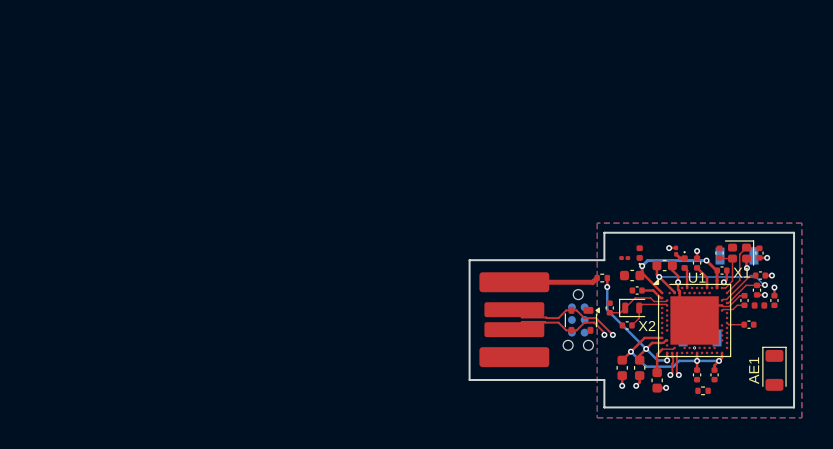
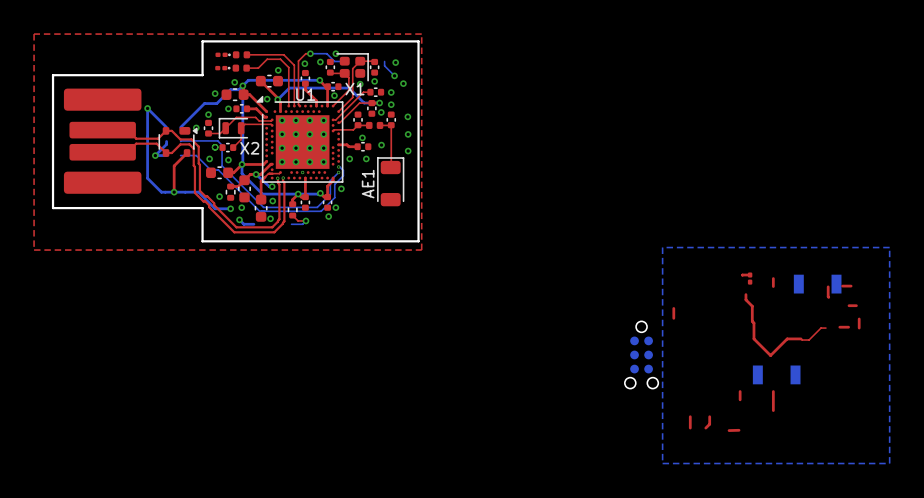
top zone outline: none -> (34, 34) (421, 34) (421, 250) (34, 250) (34, 34)
board edge: none -> (202, 41) (202, 75) (53, 75) (53, 208) (202, 208) (202, 241) (418, 241) (418, 41) (202, 41)
top track: none -> (310, 53) (305, 53) (298, 61) (299, 106)
bottom track: none -> (310, 53) (326, 53) (334, 61) (346, 61)
via: none -> (310, 53)
via: none -> (335, 53)
part: none -> (221, 54)
part: none -> (239, 54)
top track: none -> (246, 54) (283, 54) (294, 65) (294, 106)
via: none -> (320, 62)
top track: none -> (374, 61) (360, 61) (352, 68) (352, 97) (338, 111)
bottom track: none -> (384, 61) (384, 65) (394, 75)
via: none -> (395, 62)
via: none -> (304, 63)
part: none -> (330, 67)
part: none -> (374, 67)
part: none -> (221, 68)
part: none -> (238, 68)
top track: none -> (246, 68) (258, 68) (267, 59) (280, 59) (288, 67) (288, 106)
via: none -> (278, 70)
top track: none -> (330, 72) (344, 73) (348, 77) (348, 90) (333, 106)
via: none -> (394, 75)
part: none -> (305, 78)
top track: none -> (319, 80) (327, 86) (327, 106)
bottom track: none -> (319, 80) (248, 80) (238, 89) (230, 89) (216, 103) (204, 103) (180, 127)
via: none -> (319, 80)
top track: none -> (260, 81) (277, 98) (280, 102) (280, 111)
part: none -> (269, 81)
via: none -> (374, 81)
via: none -> (234, 82)
top track: none -> (305, 83) (305, 89) (316, 100) (316, 106)
via: none -> (360, 84)
via: none -> (403, 83)
top track: none -> (242, 85) (243, 94) (249, 94) (266, 111)
bottom track: none -> (242, 85) (242, 173) (262, 194) (320, 193)
via: none -> (242, 85)
part: none -> (333, 86)
top track: none -> (370, 92) (363, 92) (335, 119) (333, 119)
part: none -> (375, 92)
via: none -> (391, 92)
via: none -> (215, 93)
part: none -> (235, 94)
via: none -> (334, 95)
via: none -> (267, 99)
bottom track: none -> (277, 99) (289, 88) (349, 88) (364, 103) (379, 103)
via: none -> (277, 99)
top track: none -> (379, 103) (359, 103) (338, 122)
via: none -> (379, 103)
via: none -> (391, 104)
via: none -> (147, 108)
part: none -> (371, 108)
via: none -> (228, 108)
part: none -> (241, 108)
top track: none -> (247, 108) (256, 108) (266, 117)
via: none -> (381, 112)
via: none -> (208, 114)
via: none -> (407, 116)
top track: none -> (272, 119) (259, 120) (255, 117) (236, 117) (220, 133) (208, 133)
via: none -> (282, 120)
via: none -> (296, 120)
via: none -> (309, 120)
via: none -> (323, 120)
part: none -> (358, 119)
part: none -> (391, 119)
top track: none -> (272, 125) (245, 124) (241, 128) (241, 139) (233, 147)
top track: none -> (369, 125) (358, 125) (353, 129) (333, 130)
part: none -> (374, 125)
top track: none -> (380, 125) (391, 125) (391, 163) (392, 163)
bottom track: none -> (166, 127) (147, 108) (147, 178) (161, 192) (198, 192) (215, 208) (230, 208)
via: none -> (196, 127)
part: none -> (208, 128)
top track: none -> (102, 130) (127, 130) (136, 138) (158, 138) (166, 130) (171, 130) (180, 139) (191, 139) (198, 146) (199, 190) (236, 227) (272, 227) (278, 221) (279, 184) (277, 178)
via: none -> (282, 134)
via: none -> (296, 134)
via: none -> (309, 134)
via: none -> (323, 134)
via: none -> (408, 134)
via: none -> (362, 137)
part: none -> (102, 141)
bottom track: none -> (166, 141) (166, 144) (155, 155) (166, 155)
part: none -> (178, 141)
bottom track: none -> (180, 141) (217, 140) (222, 145) (222, 165) (263, 207) (317, 207) (330, 194) (330, 180) (338, 172)
top track: none -> (338, 144) (357, 146)
via: none -> (381, 145)
via: none -> (215, 147)
part: none -> (362, 146)
part: none -> (227, 147)
via: none -> (282, 148)
via: none -> (296, 148)
via: none -> (309, 148)
via: none -> (323, 148)
via: none -> (408, 151)
top track: none -> (102, 152) (127, 152) (136, 143) (156, 143) (166, 153) (171, 153) (180, 144) (189, 144) (193, 148) (194, 192) (234, 232) (274, 232) (282, 223) (283, 178)
top track: none -> (187, 153) (174, 165) (174, 192)
via: none -> (155, 155)
bottom track: none -> (180, 155) (196, 155) (210, 170) (218, 170) (259, 211) (321, 211) (334, 197) (334, 184) (343, 175) (343, 170) (338, 166)
via: none -> (209, 158)
via: none -> (349, 158)
via: none -> (366, 158)
via: none -> (228, 160)
top track: none -> (266, 161) (263, 164) (242, 164) (233, 172) (228, 172)
via: none -> (282, 161)
via: none -> (296, 161)
via: none -> (309, 161)
via: none -> (323, 161)
via: none -> (242, 164)
top track: none -> (272, 164) (260, 174) (250, 174) (238, 186) (230, 186)
via: none -> (338, 166)
part: none -> (219, 172)
top track: none -> (280, 172) (268, 173) (263, 178)
via: none -> (302, 172)
via: none -> (338, 172)
bottom track: none -> (256, 174) (269, 186) (272, 186)
via: none -> (256, 174)
top track: none -> (265, 176) (261, 181) (261, 199)
via: none -> (277, 178)
via: none -> (283, 178)
top track: none -> (305, 178) (305, 197) (301, 197) (298, 194) (292, 199) (292, 204)
top track: none -> (333, 178) (327, 186) (327, 197) (324, 197) (320, 193)
via: none -> (272, 186)
part: none -> (244, 188)
via: none -> (341, 188)
via: none -> (174, 192)
part: none -> (230, 192)
via: none -> (298, 194)
via: none -> (320, 193)
via: none -> (219, 196)
via: none -> (272, 201)
part: none -> (305, 202)
part: none -> (327, 202)
via: none -> (241, 207)
part: none -> (261, 208)
via: none -> (335, 207)
via: none -> (230, 208)
part: none -> (292, 209)
top track: none -> (292, 215) (298, 220) (305, 220)
via: none -> (328, 216)
via: none -> (270, 218)
bottom track: none -> (239, 219) (243, 224) (253, 224)
via: none -> (239, 219)
bottom track: none -> (305, 220) (302, 224) (291, 224)
via: none -> (305, 220)
top zone outline: (597, 223) (801, 223) (801, 417) (597, 417) (597, 223) -> none
board edge: (604, 232) (604, 260) (469, 260) (469, 379) (604, 379) (604, 407) (794, 407) (794, 232) (604, 232) -> none
via: (669, 248) -> none
top track: (759, 248) (746, 247) (739, 254) (739, 280) (727, 293) -> none
via: (697, 251) -> none
part: (719, 253) -> none
X1 position: (739, 253) -> (352, 67)
part: (759, 253) -> none
top track: (676, 254) (680, 258) (685, 257) -> none
part: (639, 255) -> none
top track: (719, 257) (732, 258) -> none
via: (767, 257) -> none
part: (624, 258) -> none
top track: (732, 258) (732, 281) (725, 288) (722, 288) -> none
top track: (706, 260) (717, 270) (717, 288) -> none
bottom track: (706, 260) (647, 260) (642, 266) -> none
via: (706, 260) -> none
part: (684, 261) -> none
part: (697, 263) -> none
top track: (656, 265) (658, 276) -> none
part: (664, 265) -> none
top track: (642, 266) (642, 273) (639, 275) (644, 275) (662, 293) -> none
via: (642, 266) -> none
top track: (684, 267) (687, 270) (687, 288) -> none
top track: (697, 267) (707, 277) (707, 288) -> none
via: (747, 268) -> none
part: (722, 270) -> none
top track: (726, 270) (726, 279) (723, 282) -> none
part: (632, 275) -> none
top track: (754, 275) (750, 275) (726, 299) (722, 300) -> none
part: (760, 275) -> none
via: (771, 275) -> none
top track: (658, 276) (674, 293) -> none
bottom track: (659, 276) (755, 277) (764, 285) -> none
via: (659, 276) -> none
top track: (597, 278) (592, 282) (514, 282) -> none
part: (602, 278) -> none
via: (678, 282) -> none
via: (723, 282) -> none
top track: (764, 285) (746, 285) (727, 302) -> none
via: (764, 285) -> none
bottom track: (607, 287) (607, 309) (657, 360) (667, 360) -> none
via: (607, 287) -> none
via: (774, 287) -> none
part: (637, 290) -> none
top track: (641, 290) (653, 290) (662, 298) -> none
part: (756, 290) -> none
via: (764, 295) -> none
top track: (667, 300) (654, 301) (650, 298) (635, 298) (620, 312) (609, 312) -> none
part: (744, 300) -> none
part: (774, 300) -> none
top track: (667, 305) (642, 304) (639, 307) -> none
top track: (744, 305) (737, 305) (733, 309) (722, 310) -> none
part: (759, 305) -> none
part: (609, 307) -> none
X2 position: (632, 307) -> (233, 128)
top track: (639, 307) (639, 318) (631, 325) (631, 323) -> none
top track: (514, 309) (522, 317) (546, 318) (558, 318) (566, 310) (576, 310) (584, 318) (596, 318) (612, 334) -> none
U1 position: (692, 317) -> (299, 139)
part: (514, 319) -> none
part: (582, 320) -> none
top track: (727, 322) (728, 324) (744, 324) -> none
part: (748, 324) -> none
part: (627, 325) -> none
top track: (514, 329) (522, 321) (558, 322) (566, 330) (576, 330) (584, 322) (594, 322) (604, 334) -> none
via: (604, 334) -> none
via: (612, 334) -> none
top track: (662, 337) (644, 337) (622, 360) -> none
top track: (667, 340) (663, 342) (652, 342) (639, 355) (639, 360) -> none
top track: (674, 347) (662, 349) (657, 354) (657, 372) -> none
via: (694, 347) -> none
via: (646, 348) -> none
bottom track: (630, 351) (645, 366) (673, 366) (679, 360) (719, 360) -> none
via: (630, 351) -> none
top track: (672, 352) (672, 373) (670, 375) -> none
top track: (677, 352) (676, 373) (678, 375) -> none
top track: (722, 352) (722, 357) (714, 365) (714, 370) -> none
via: (667, 360) -> none
via: (697, 360) -> none
via: (719, 360) -> none
part: (622, 367) -> none
part: (639, 367) -> none
AE1 position: (774, 368) -> (390, 181)
part: (697, 374) -> none
part: (714, 374) -> none
via: (670, 375) -> none
via: (678, 375) -> none
part: (657, 380) -> none
via: (622, 385) -> none
via: (636, 385) -> none
via: (666, 387) -> none
part: (703, 390) -> none

